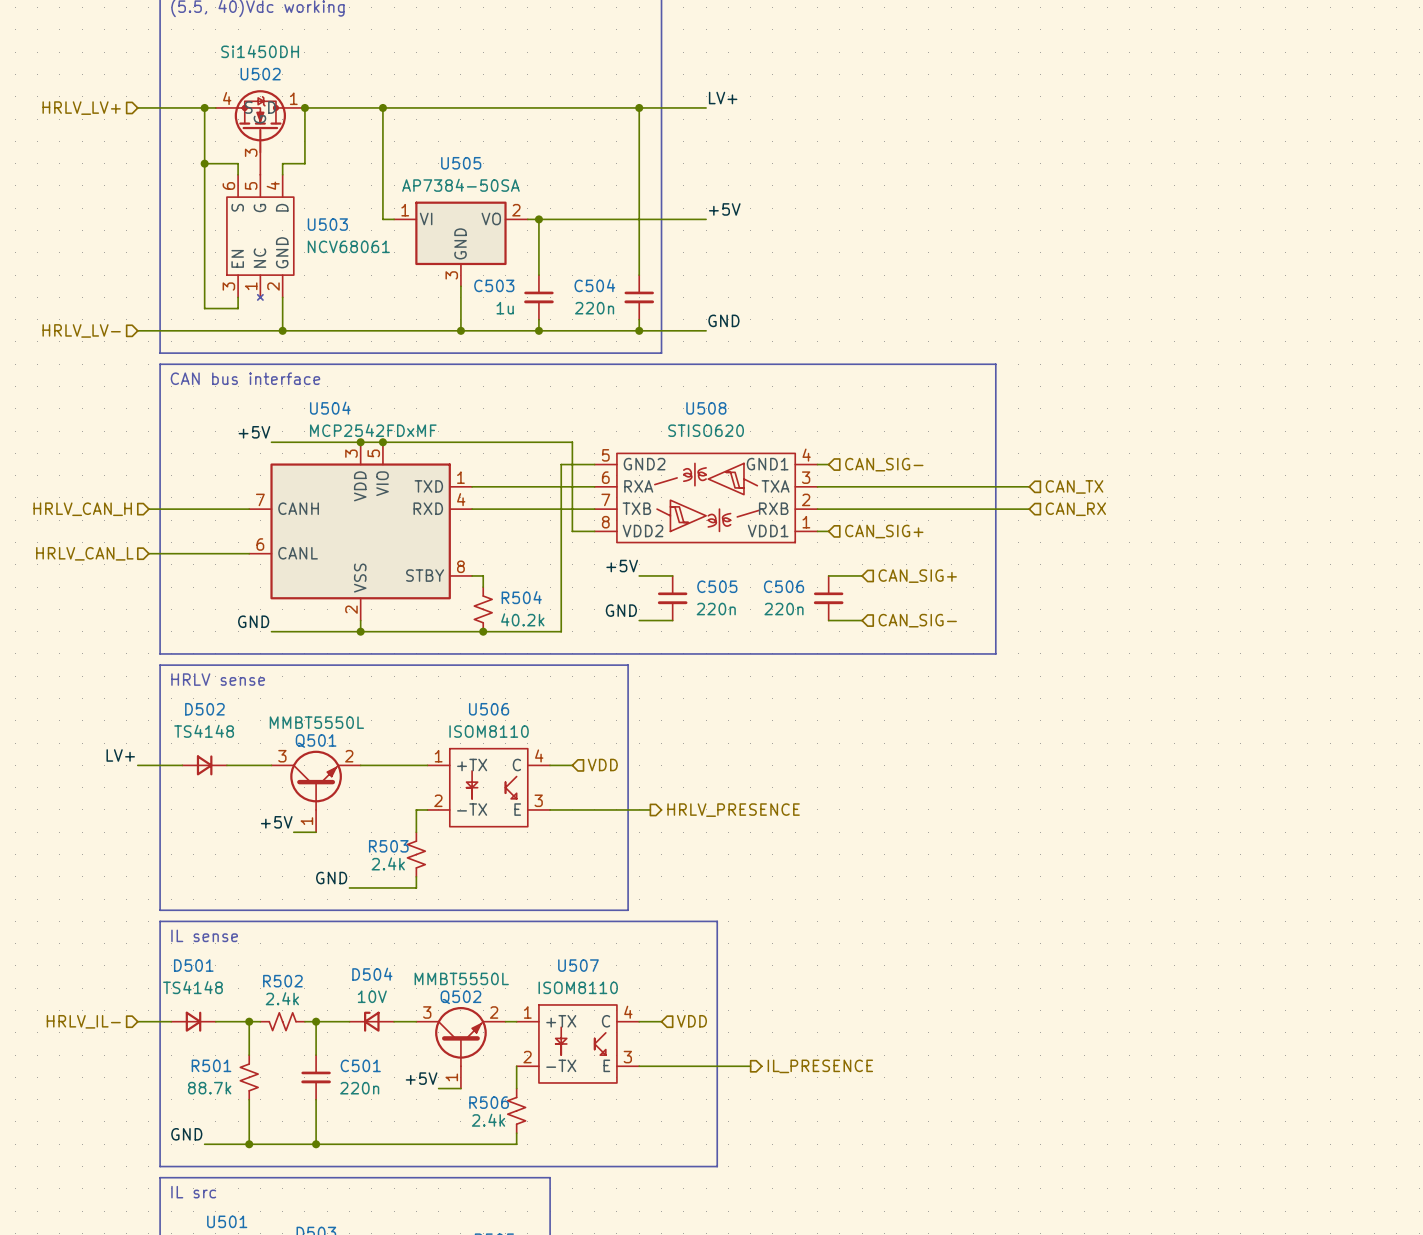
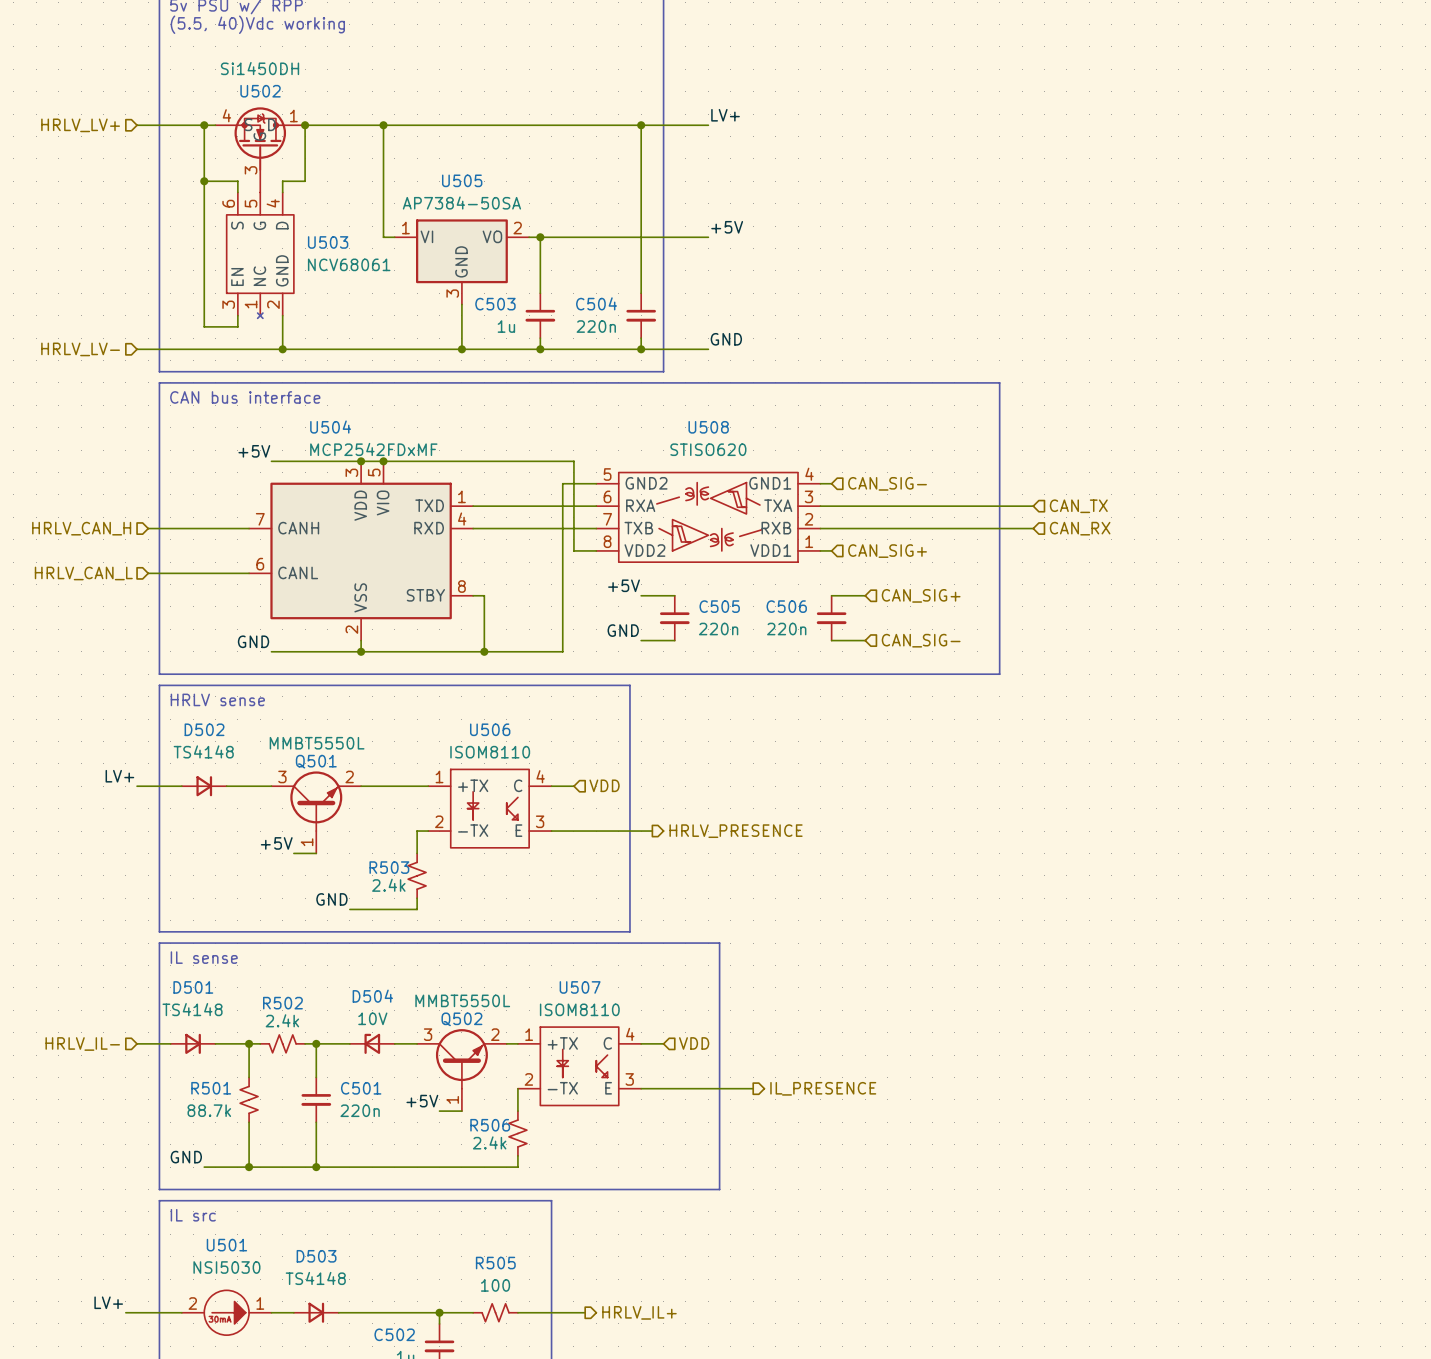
R504: 40.2k (483, 609) -> none

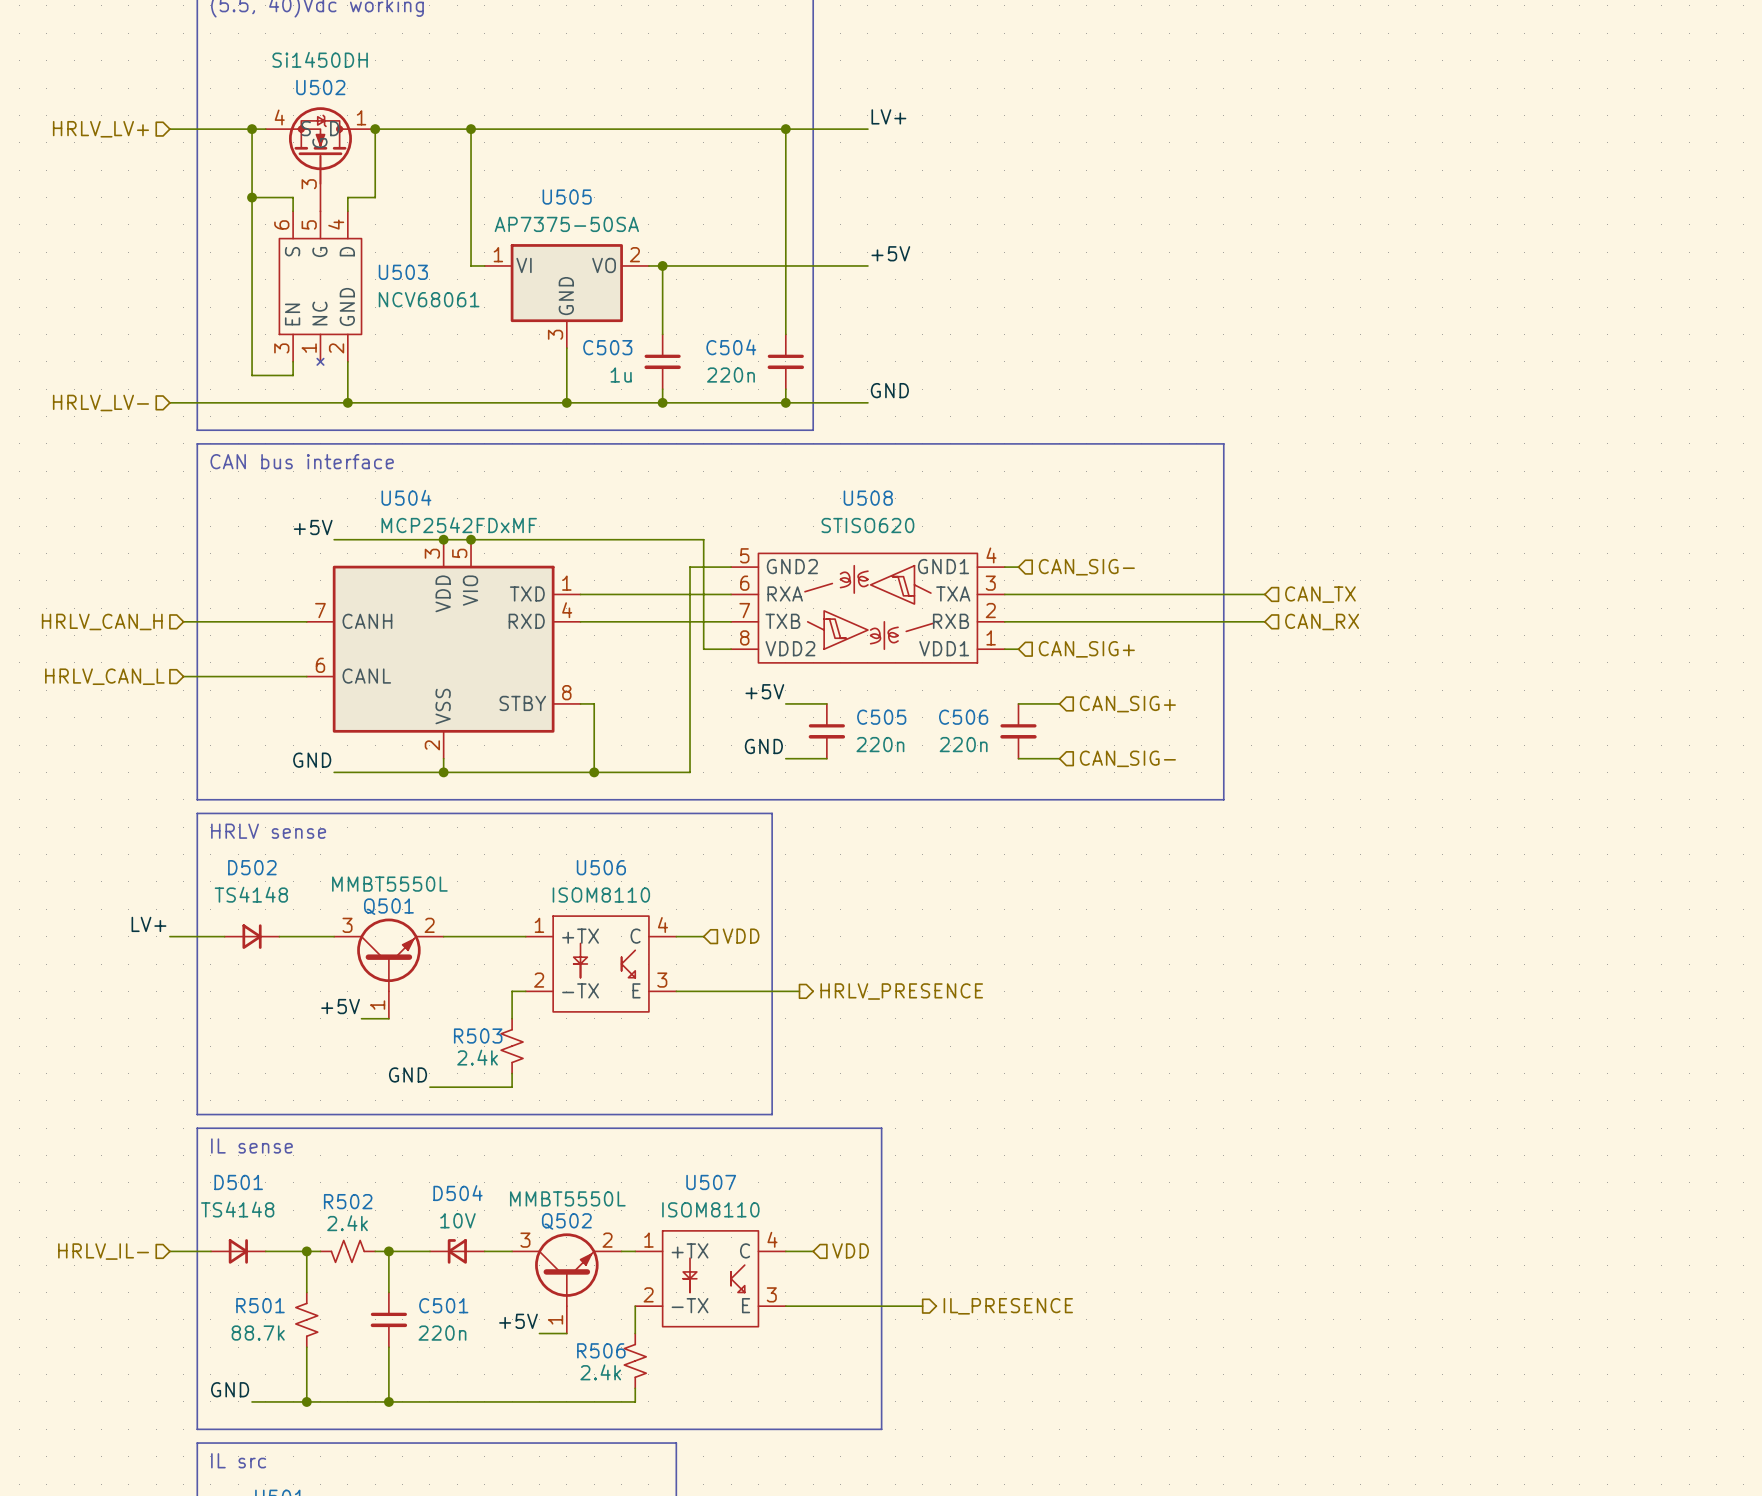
U505 value: AP7384-50SA (461, 202) -> AP7375-50SA (566, 224)

